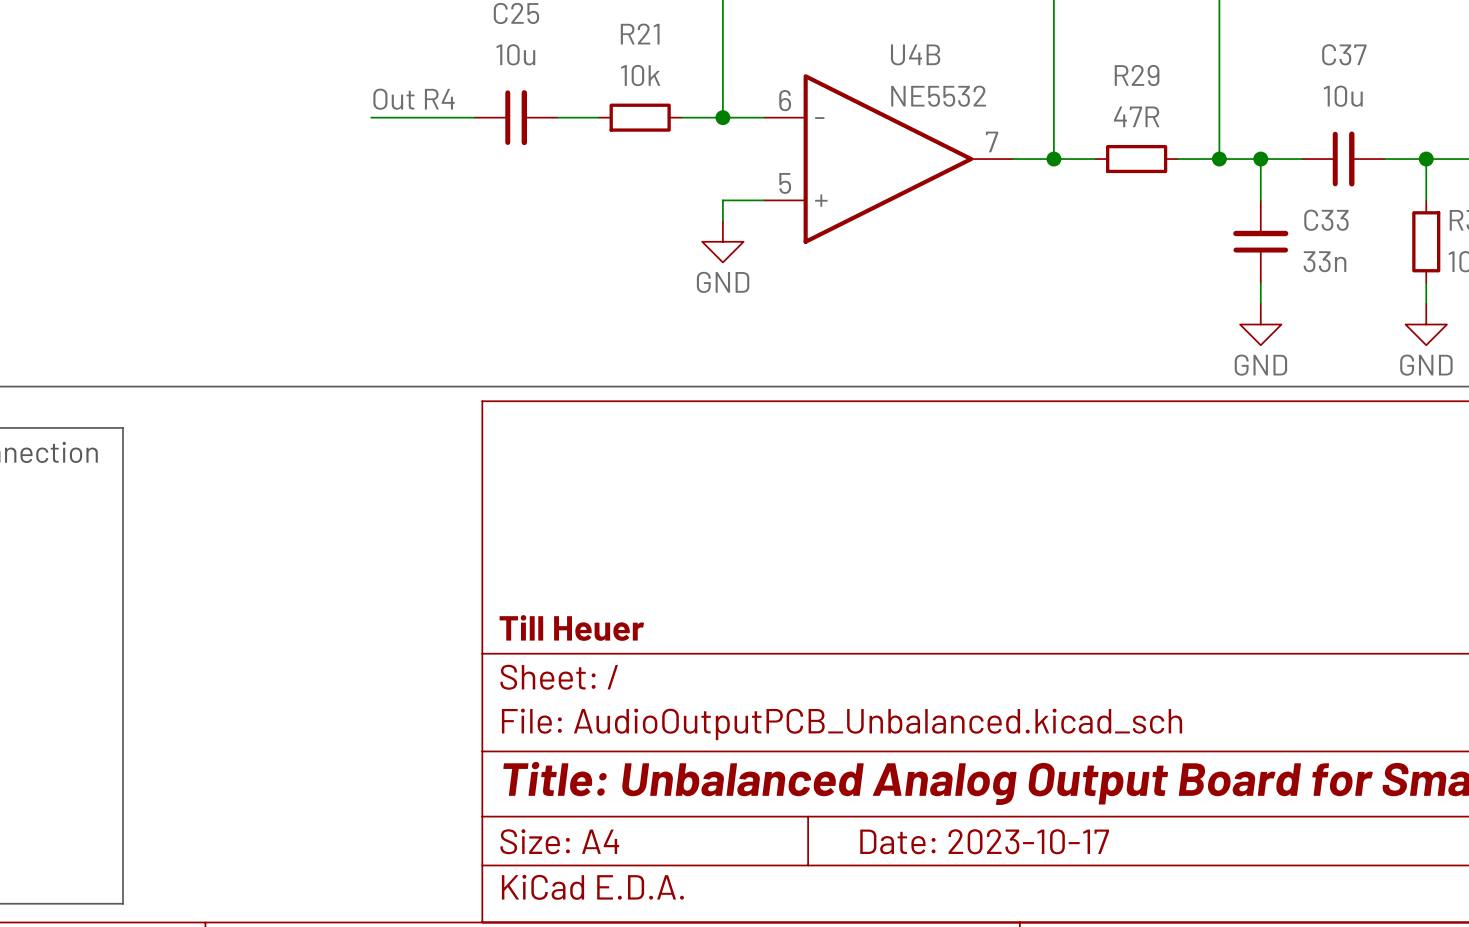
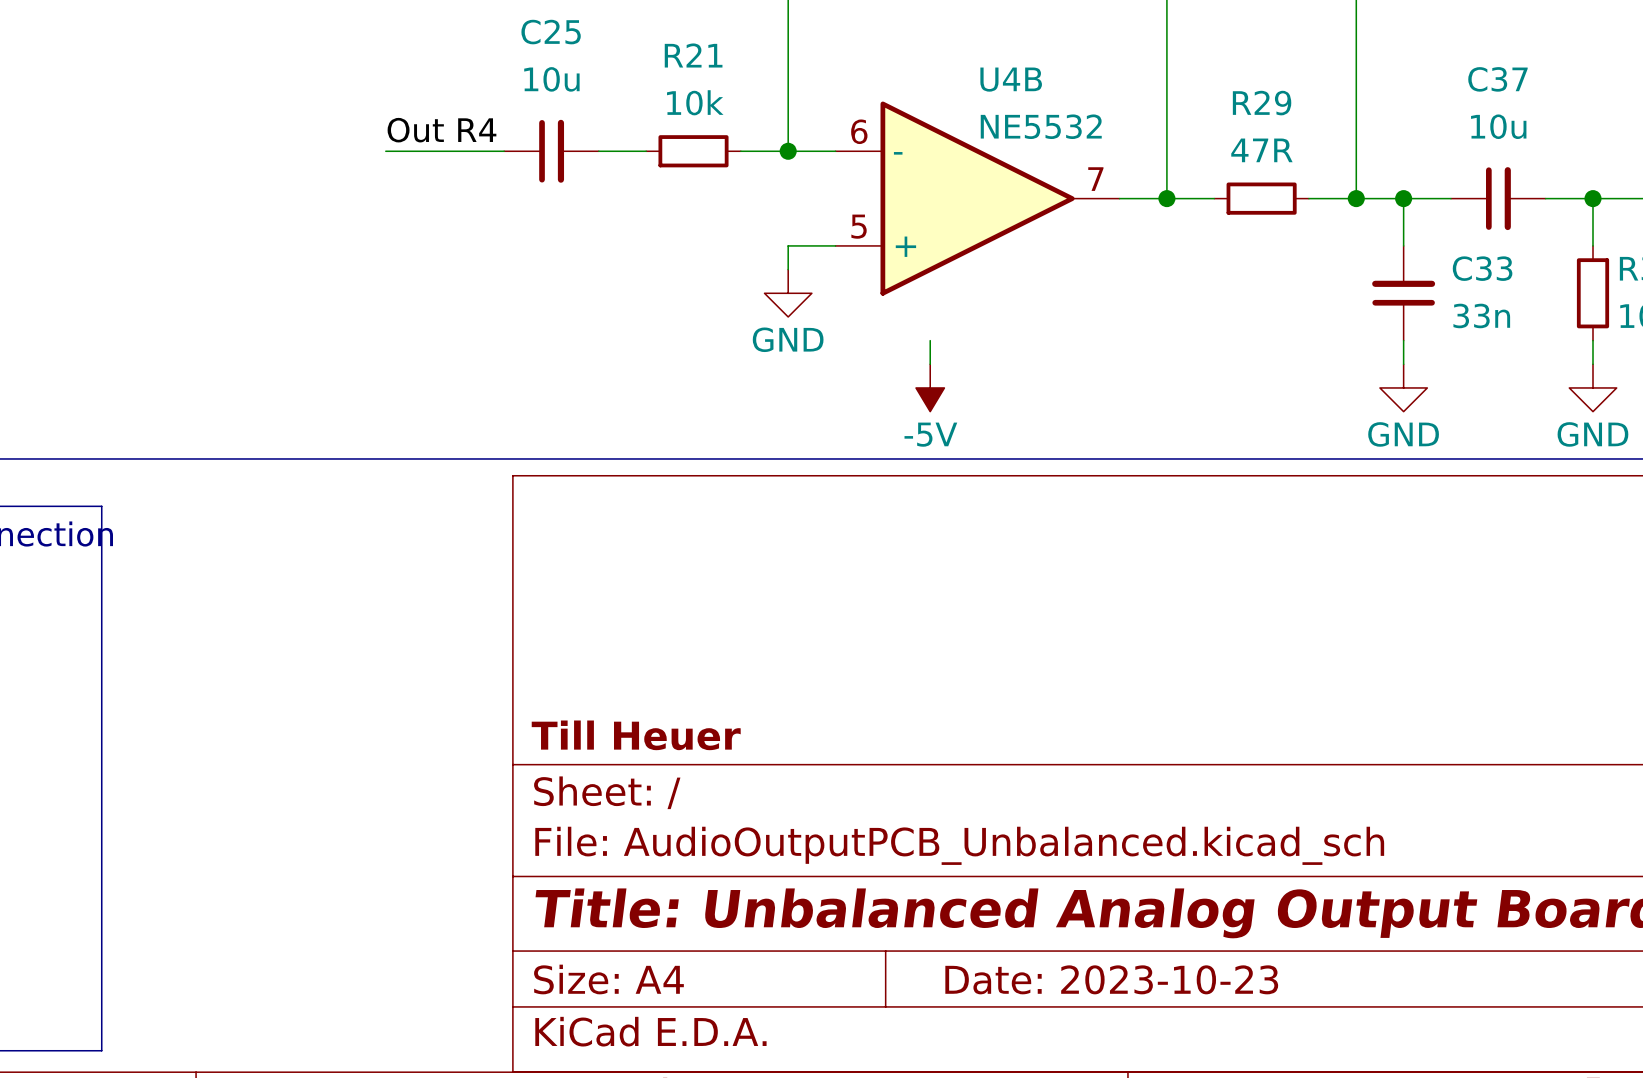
wire: none -> (930, 340) (930, 364)
power symbol: none -> -5V (930, 387)
title block: Date: 2023-10-17 (984, 841) -> Date: 2023-10-23 (1111, 979)

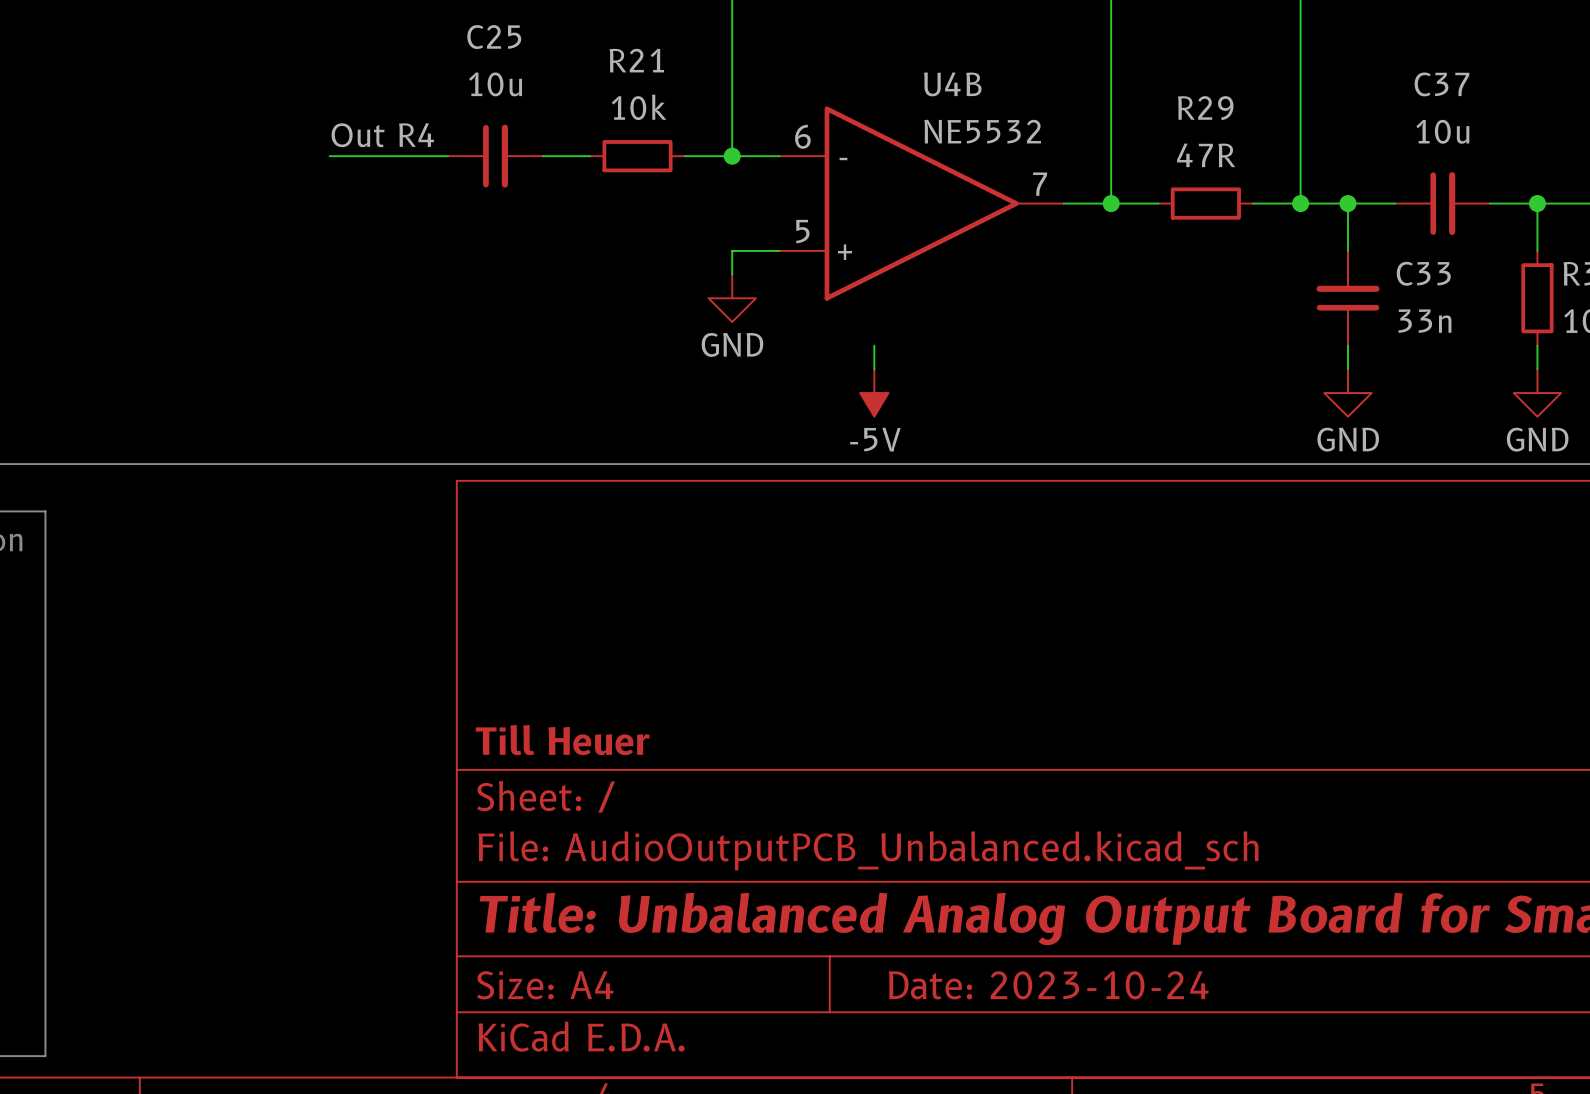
title block: Date: 2023-10-23 (1111, 979) -> Date: 2023-10-24 (1048, 985)

